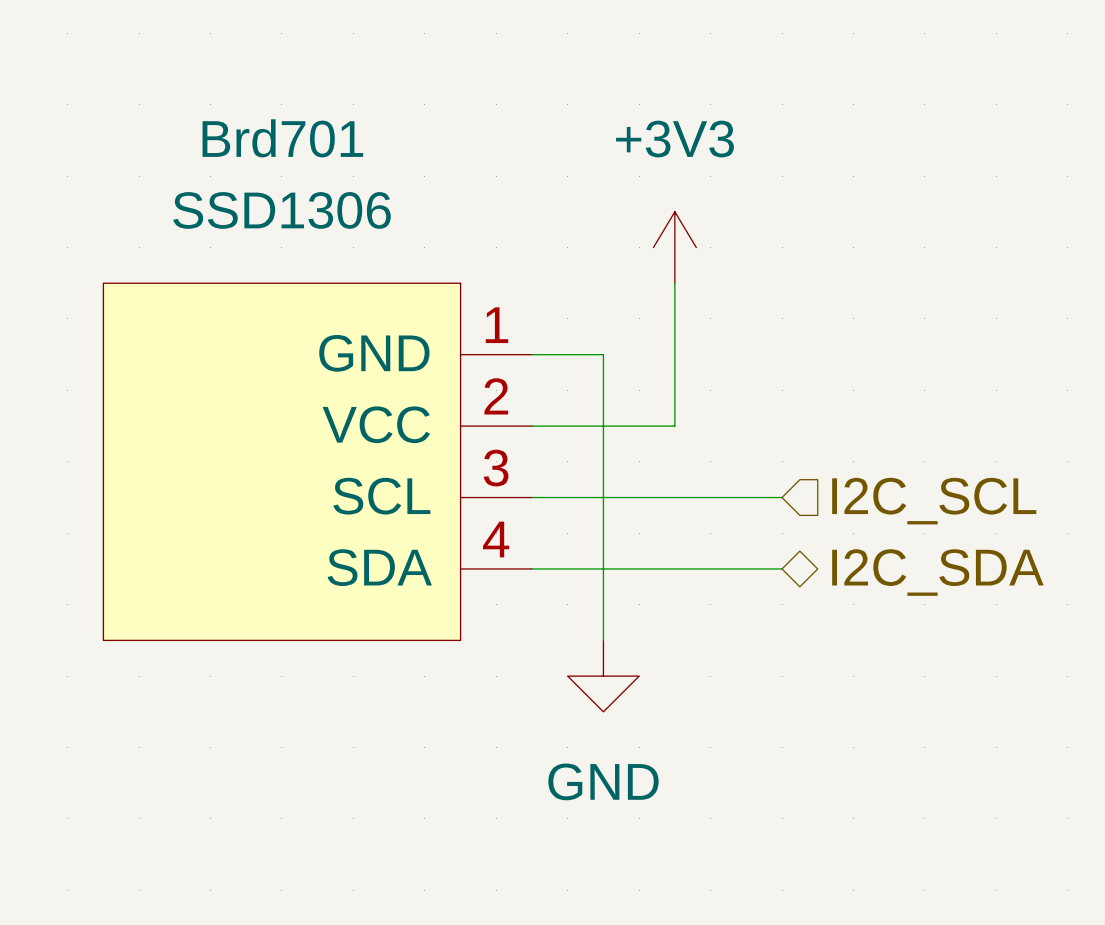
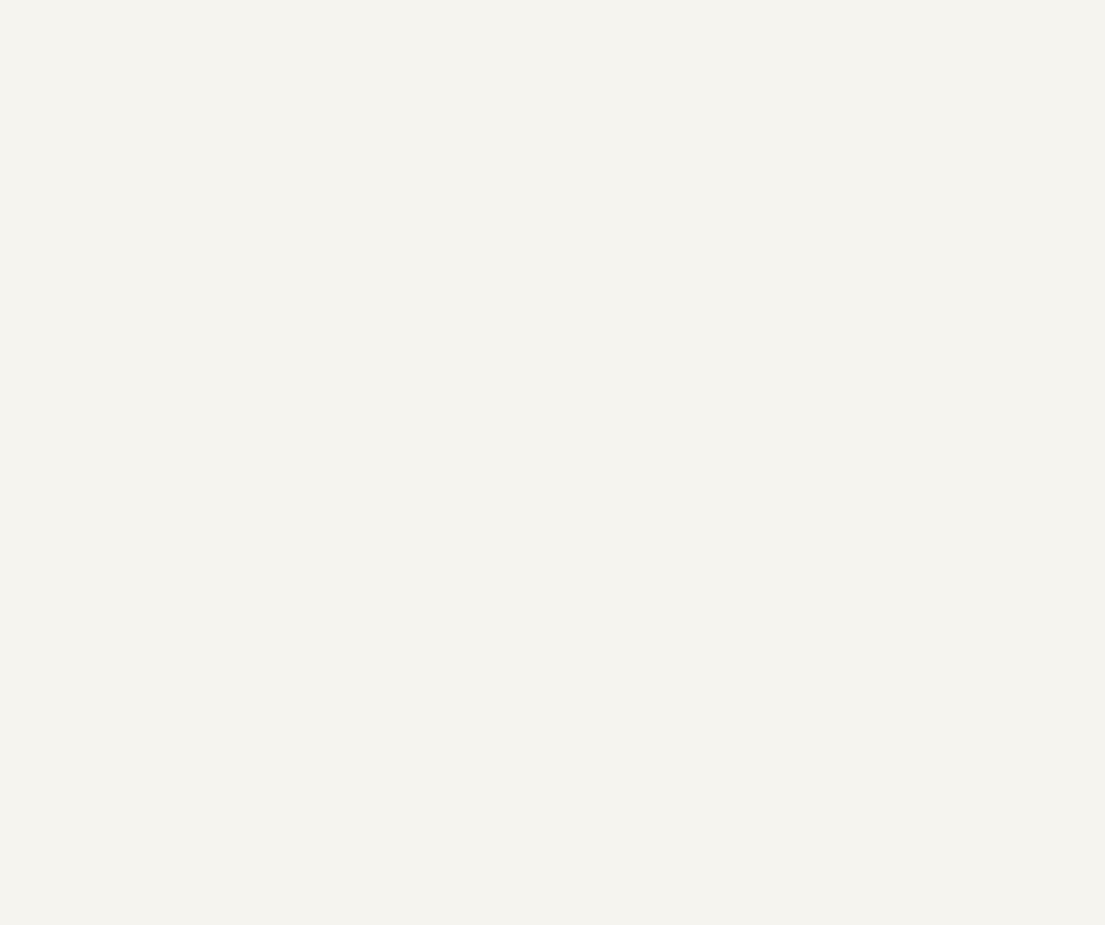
power symbol: +3V3 (674, 247) -> none
wire: (674, 283) (674, 426) (532, 426) -> none
wire: (532, 354) (603, 354) (603, 640) -> none
Brd701: SSD1306 (317, 461) -> none
wire: (532, 497) (782, 497) -> none
hierarchical label: I2C_SCL (934, 501) -> none
wire: (532, 568) (782, 568) -> none
hierarchical label: I2C_SDA (937, 572) -> none
power symbol: GND (603, 676) -> none

